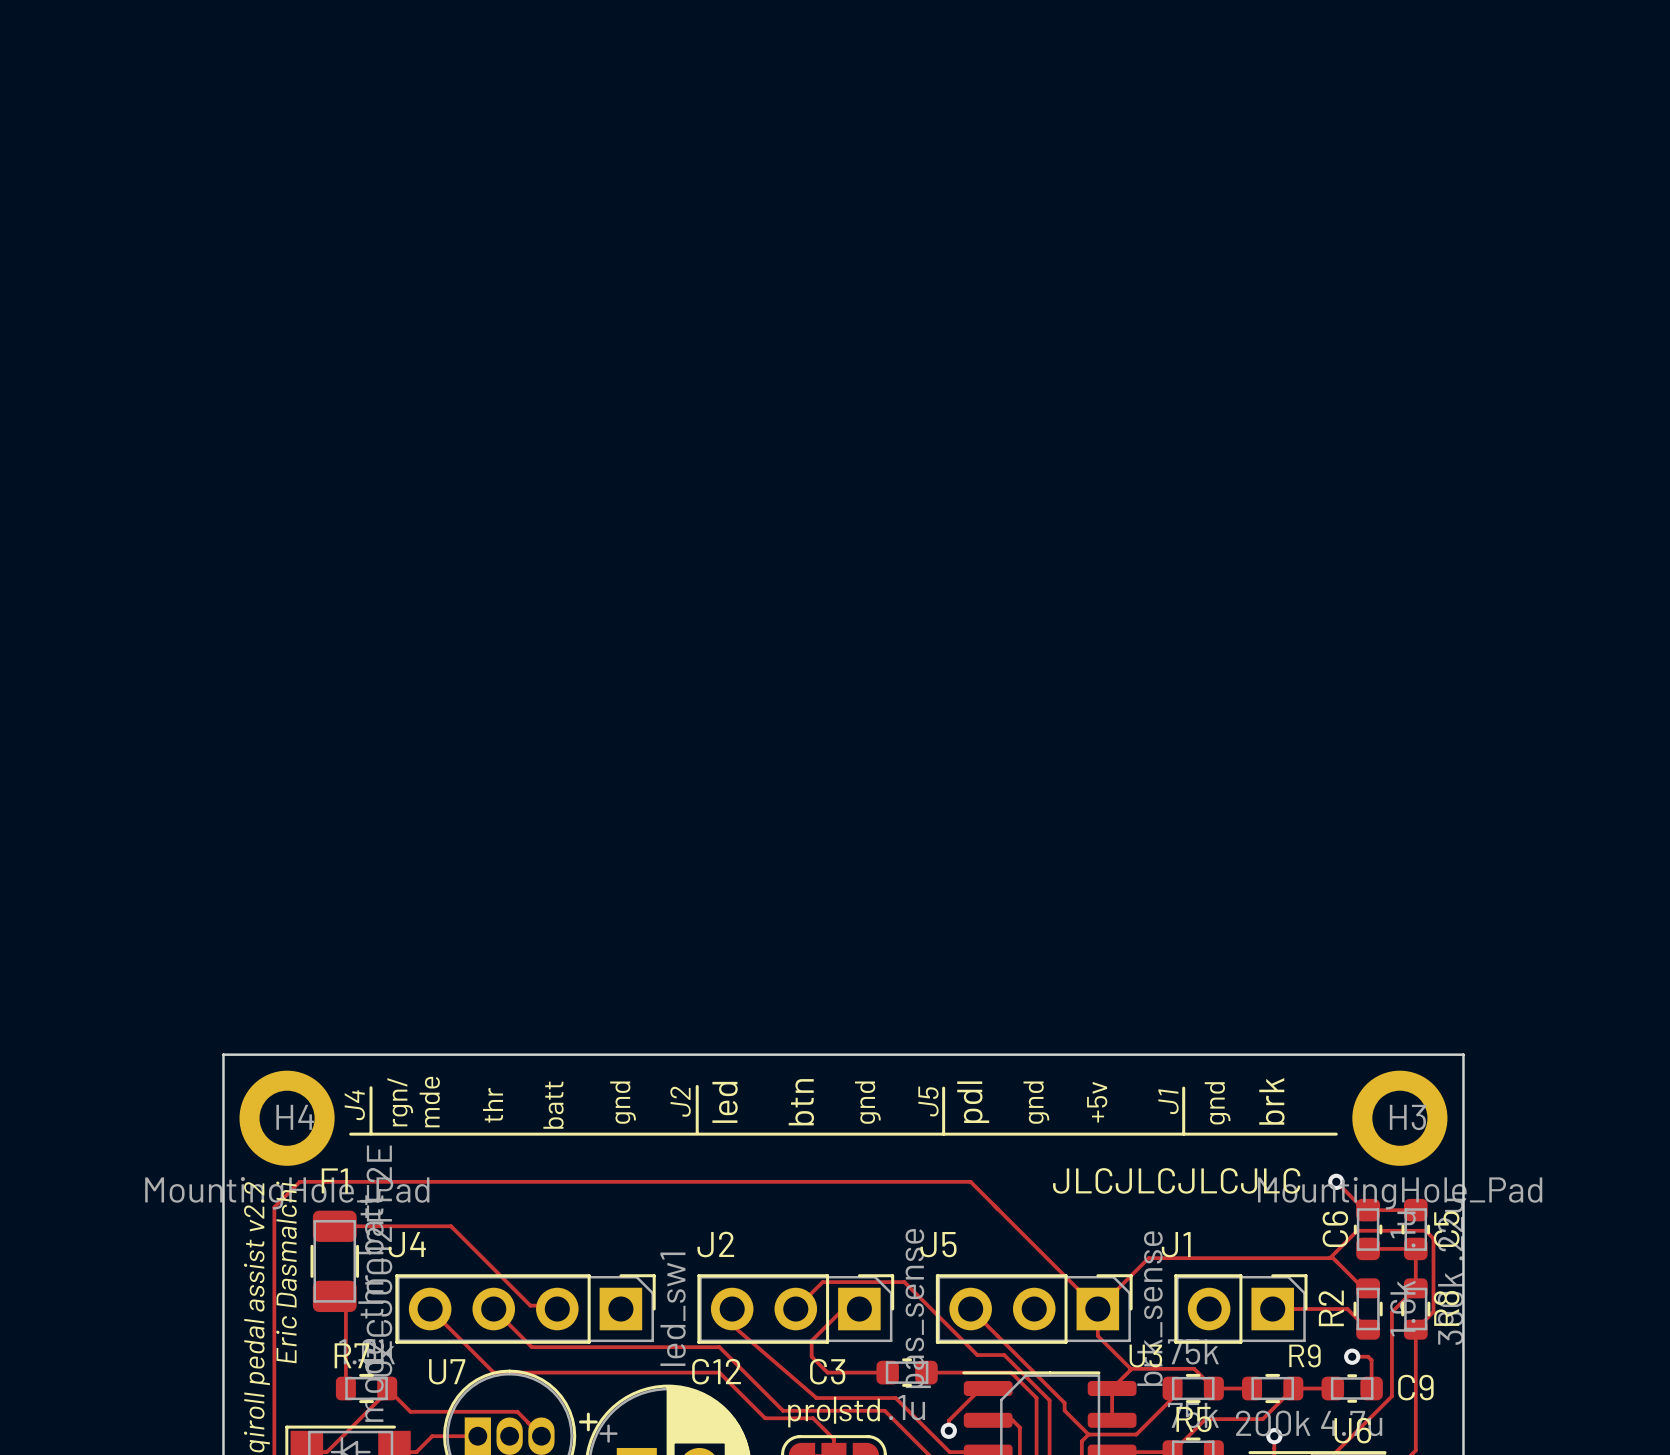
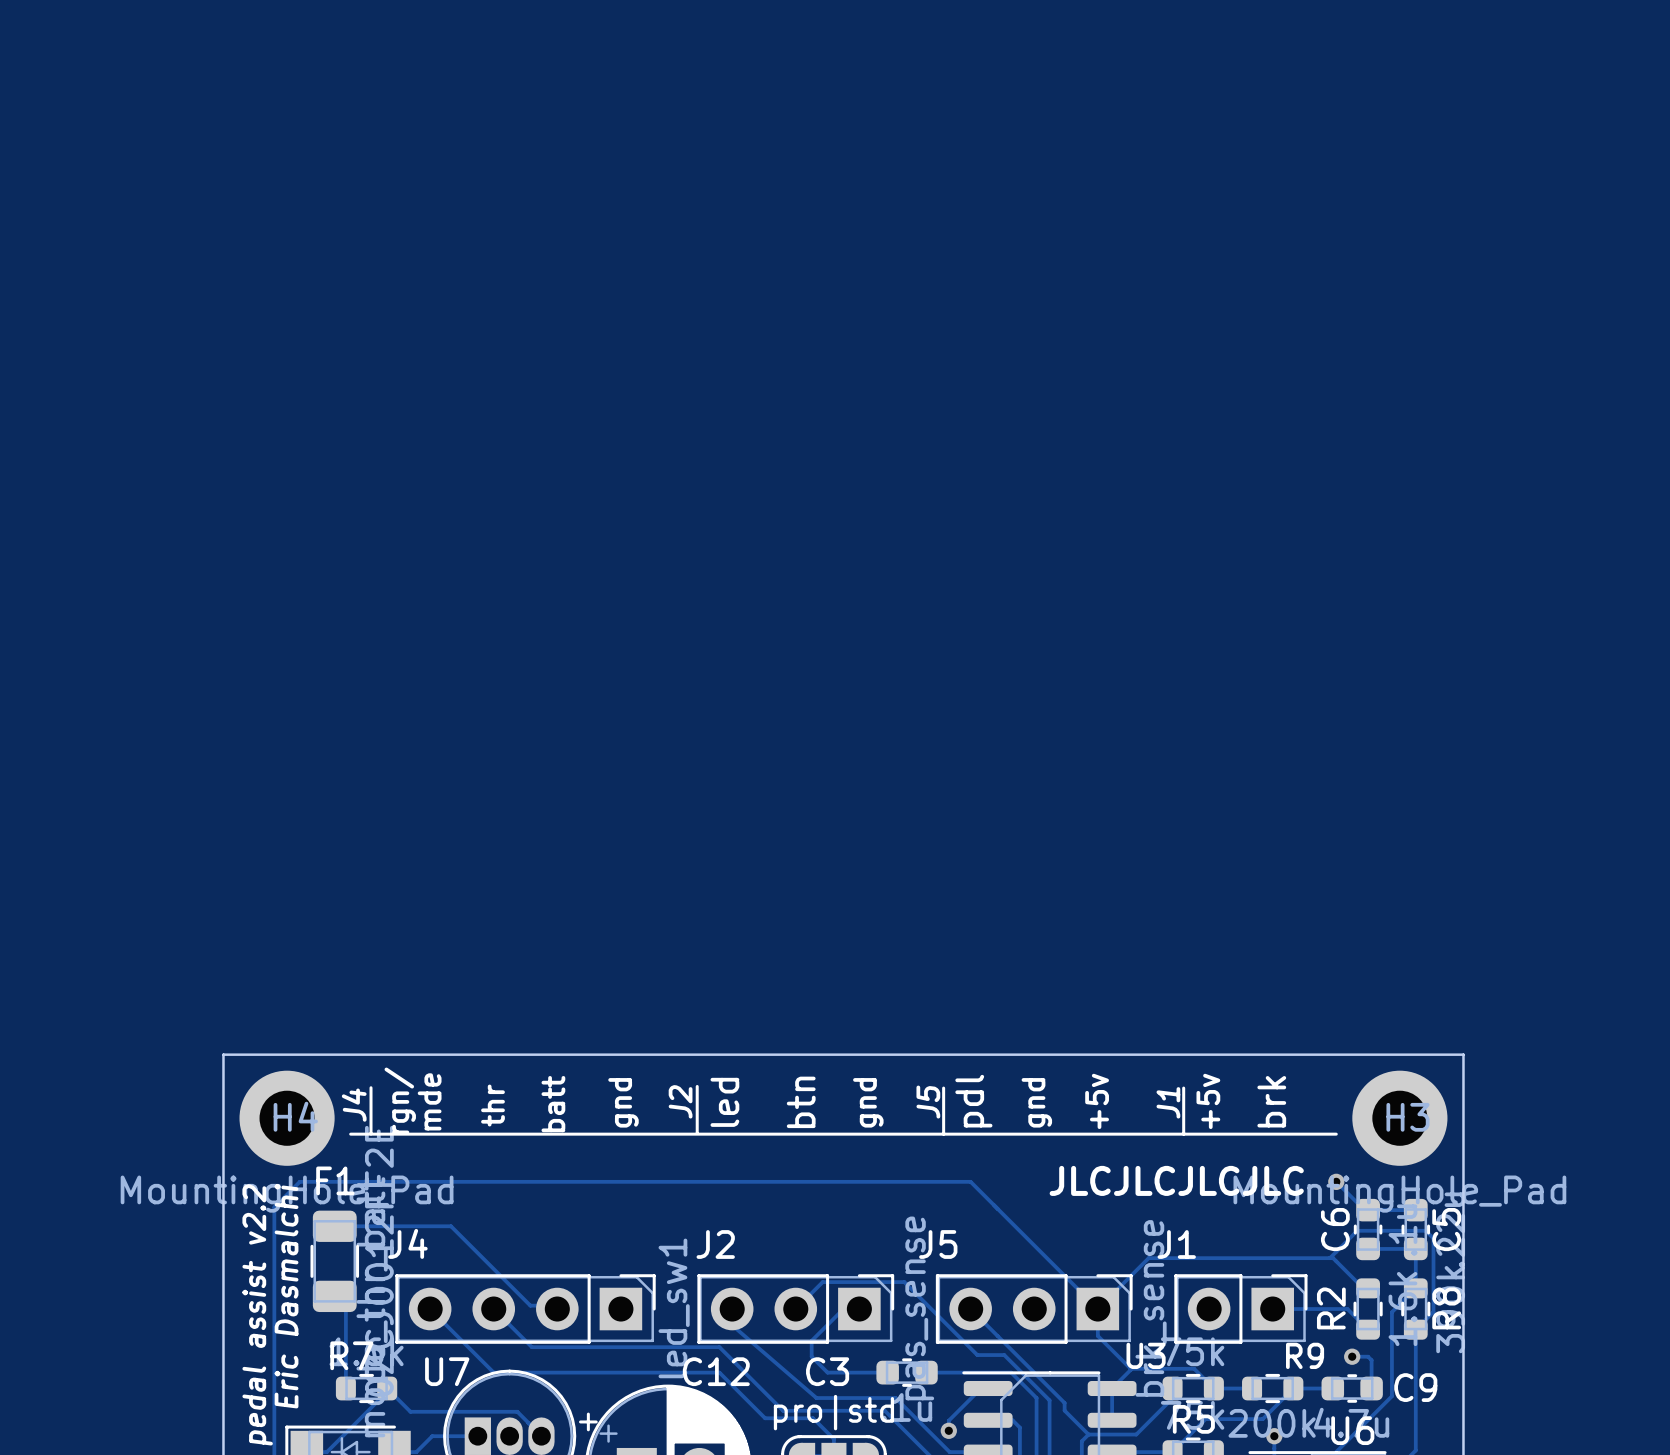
text: gnd (1217, 1103) -> +5v (1208, 1101)

